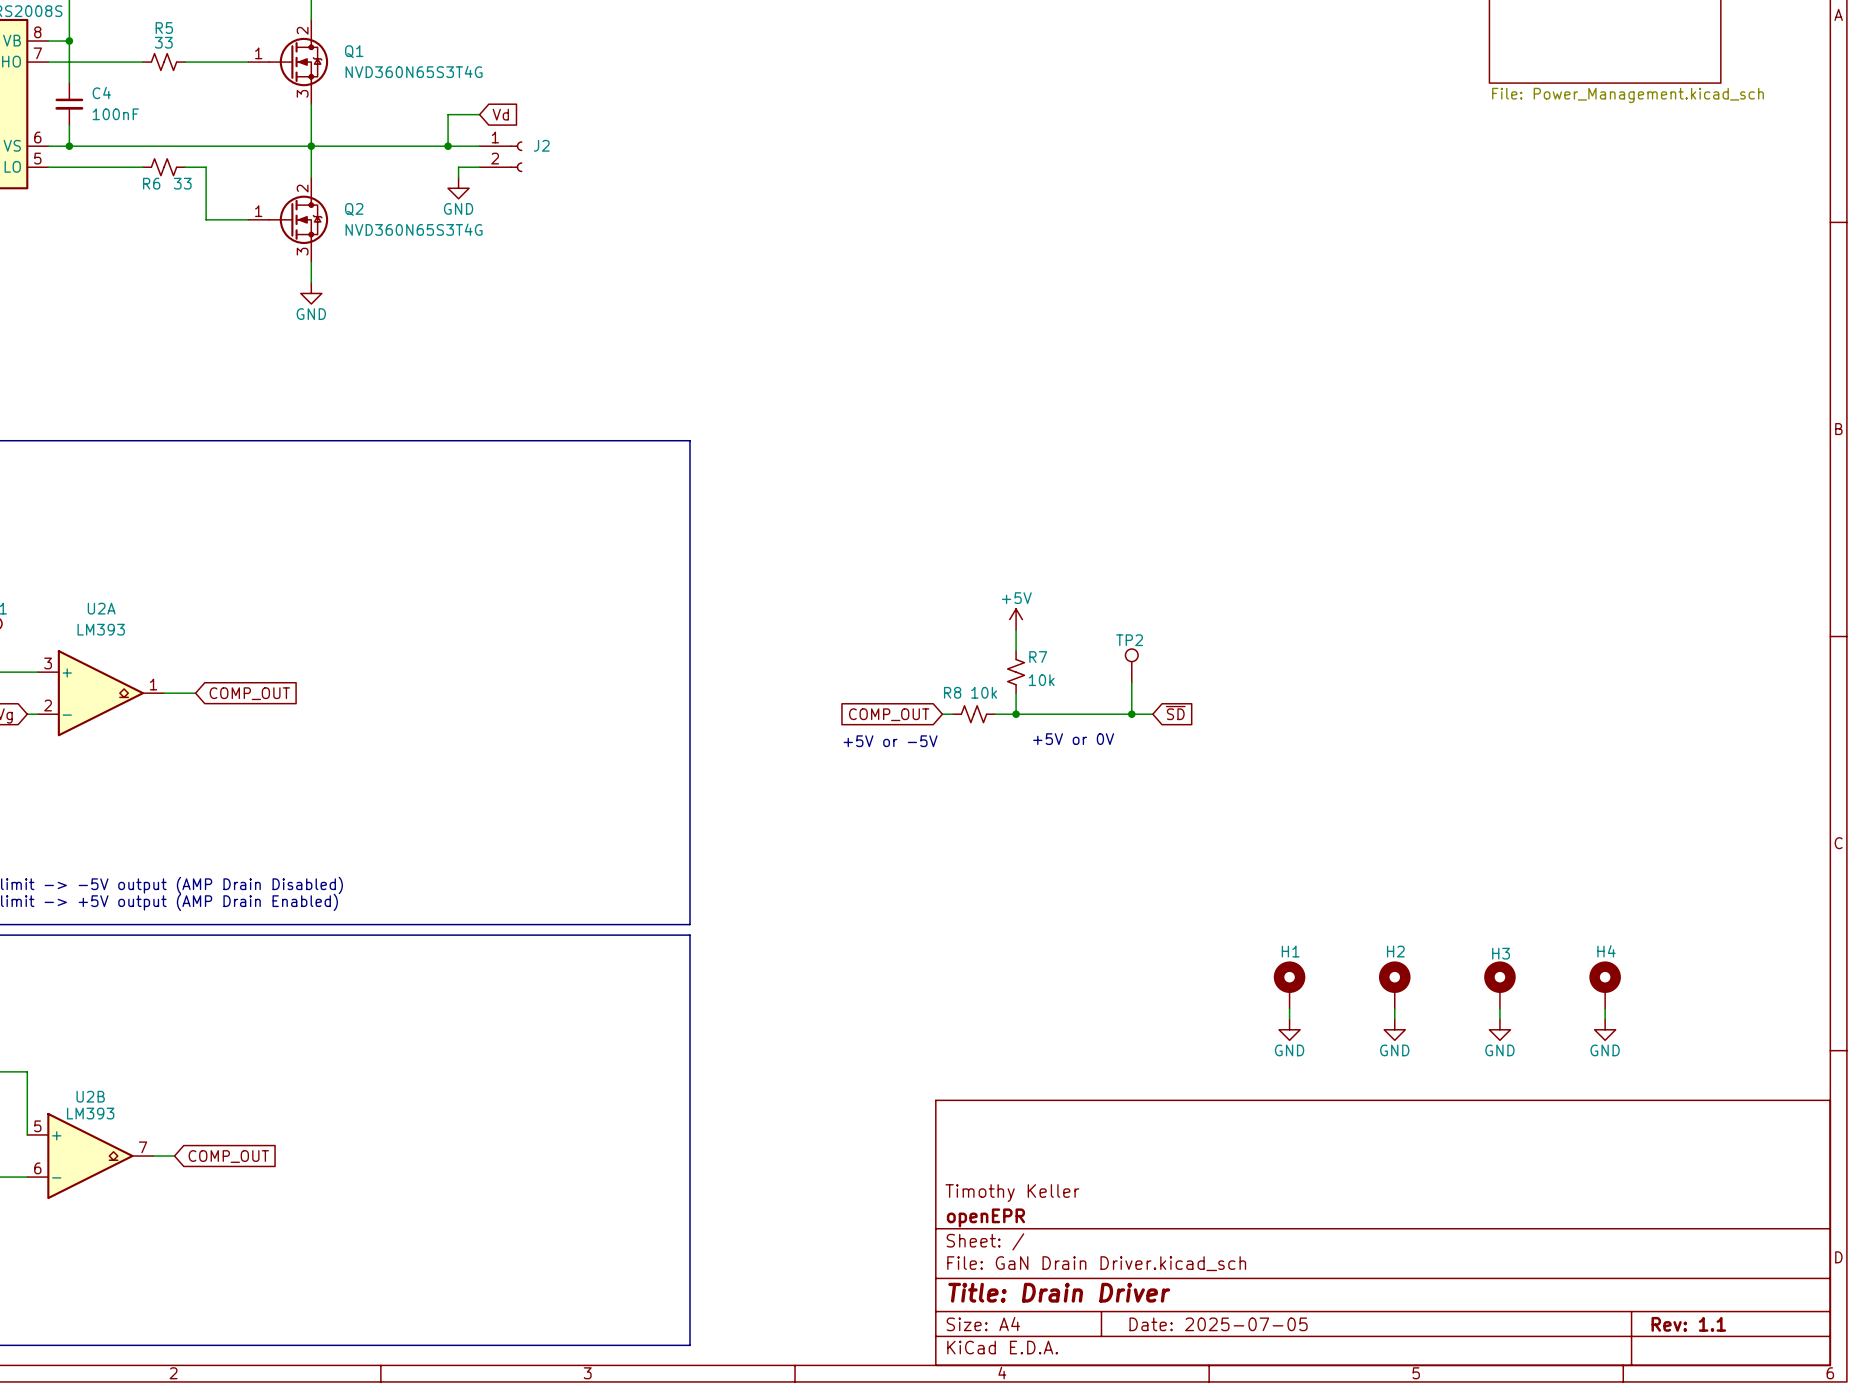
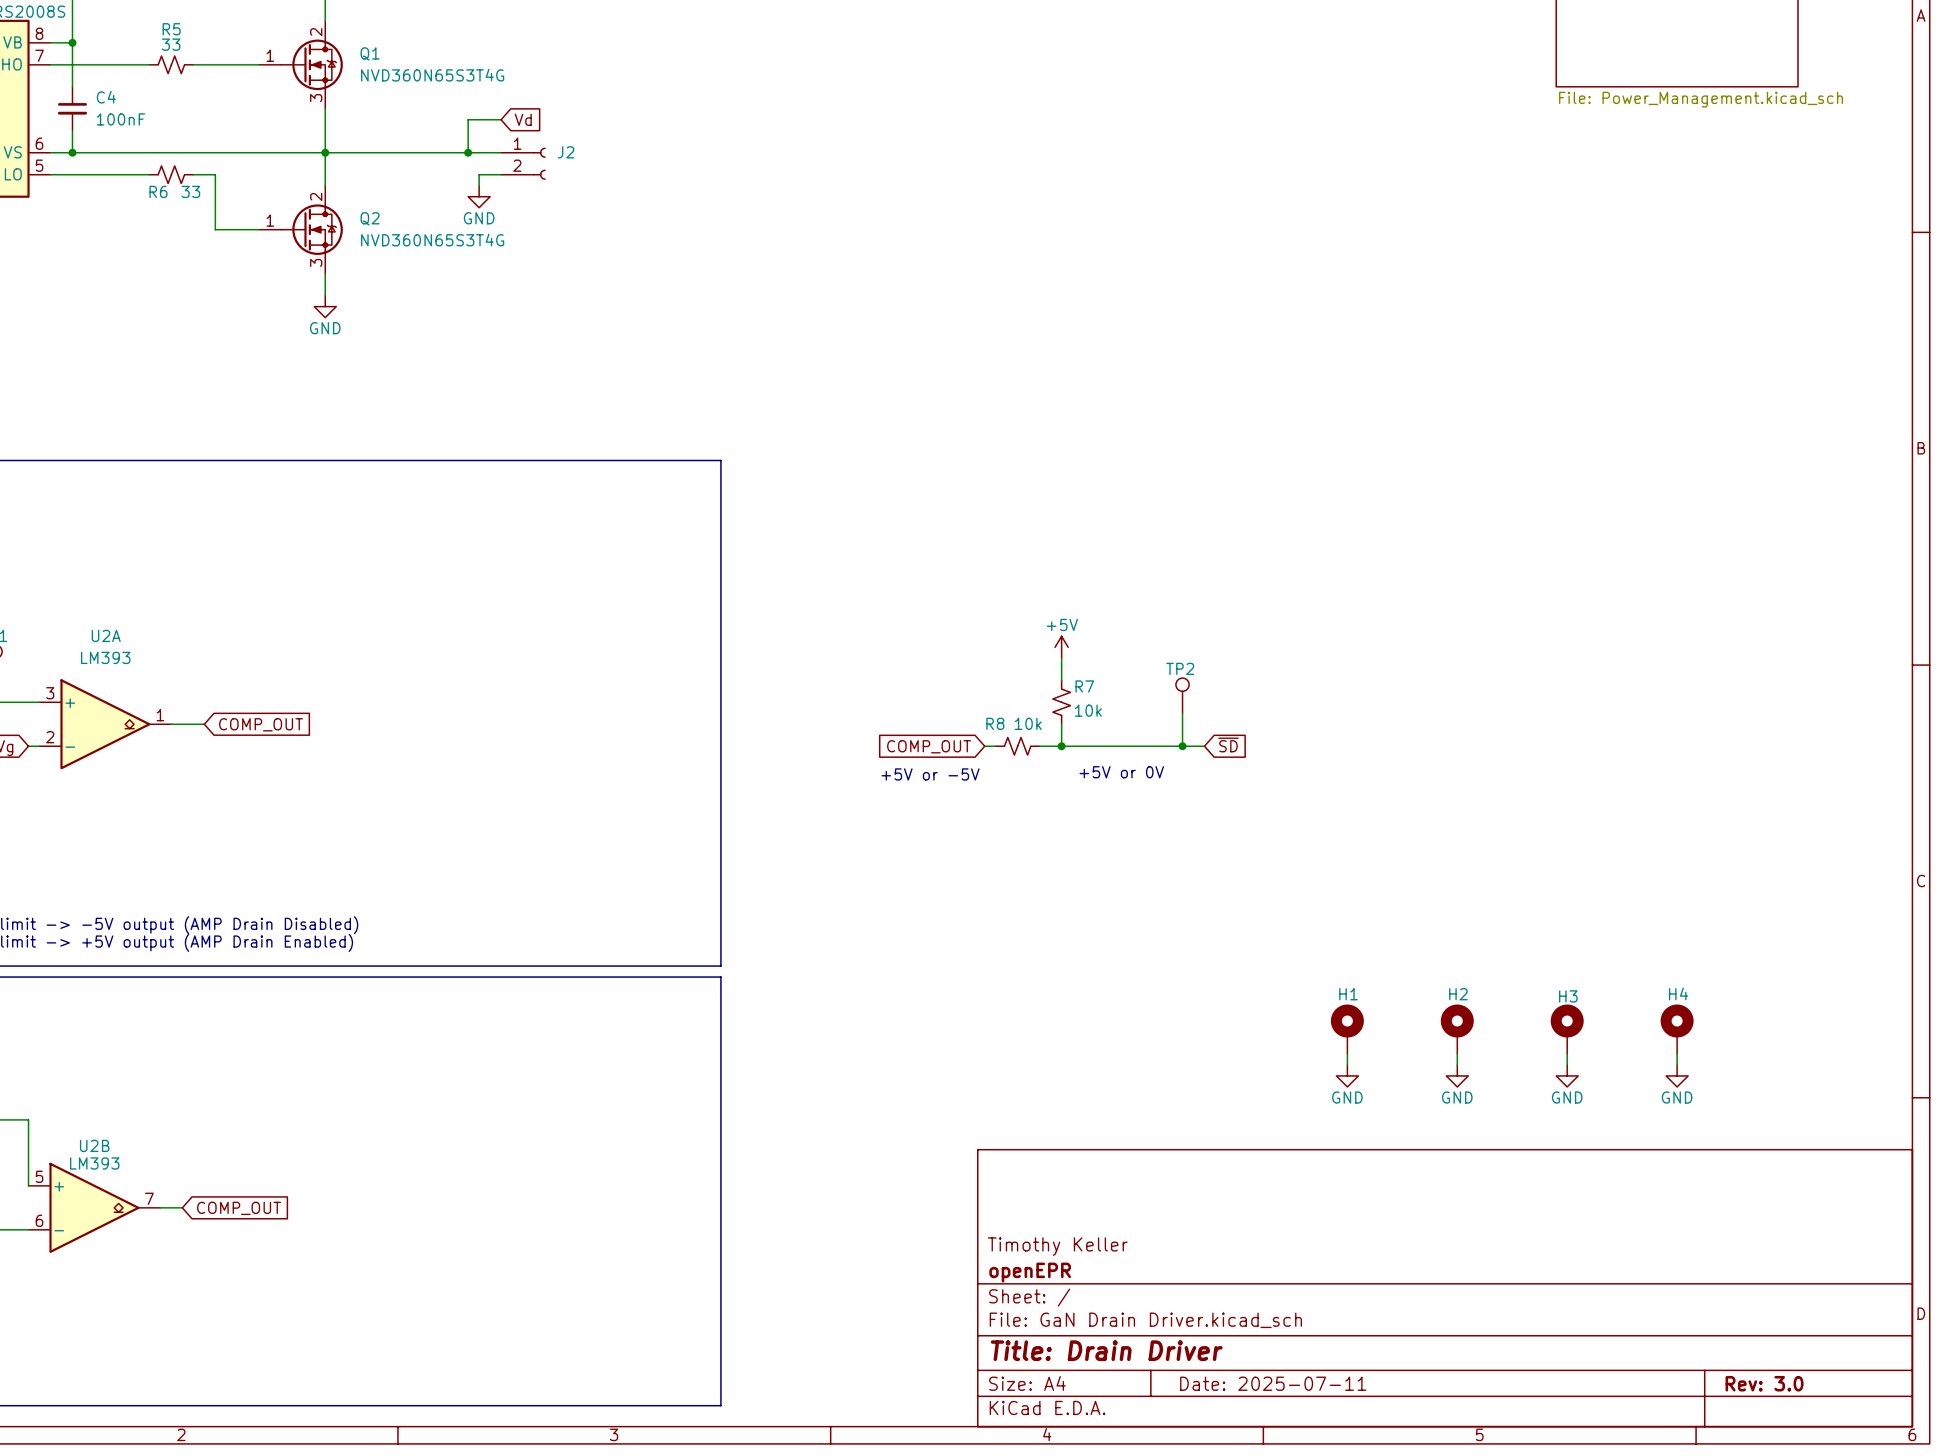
title block: Date: 2025-07-05 (1218, 1324) -> Date: 2025-07-11 (1273, 1383)
title block: Rev: 1.1 (1688, 1324) -> Rev: 3.0 (1764, 1383)

